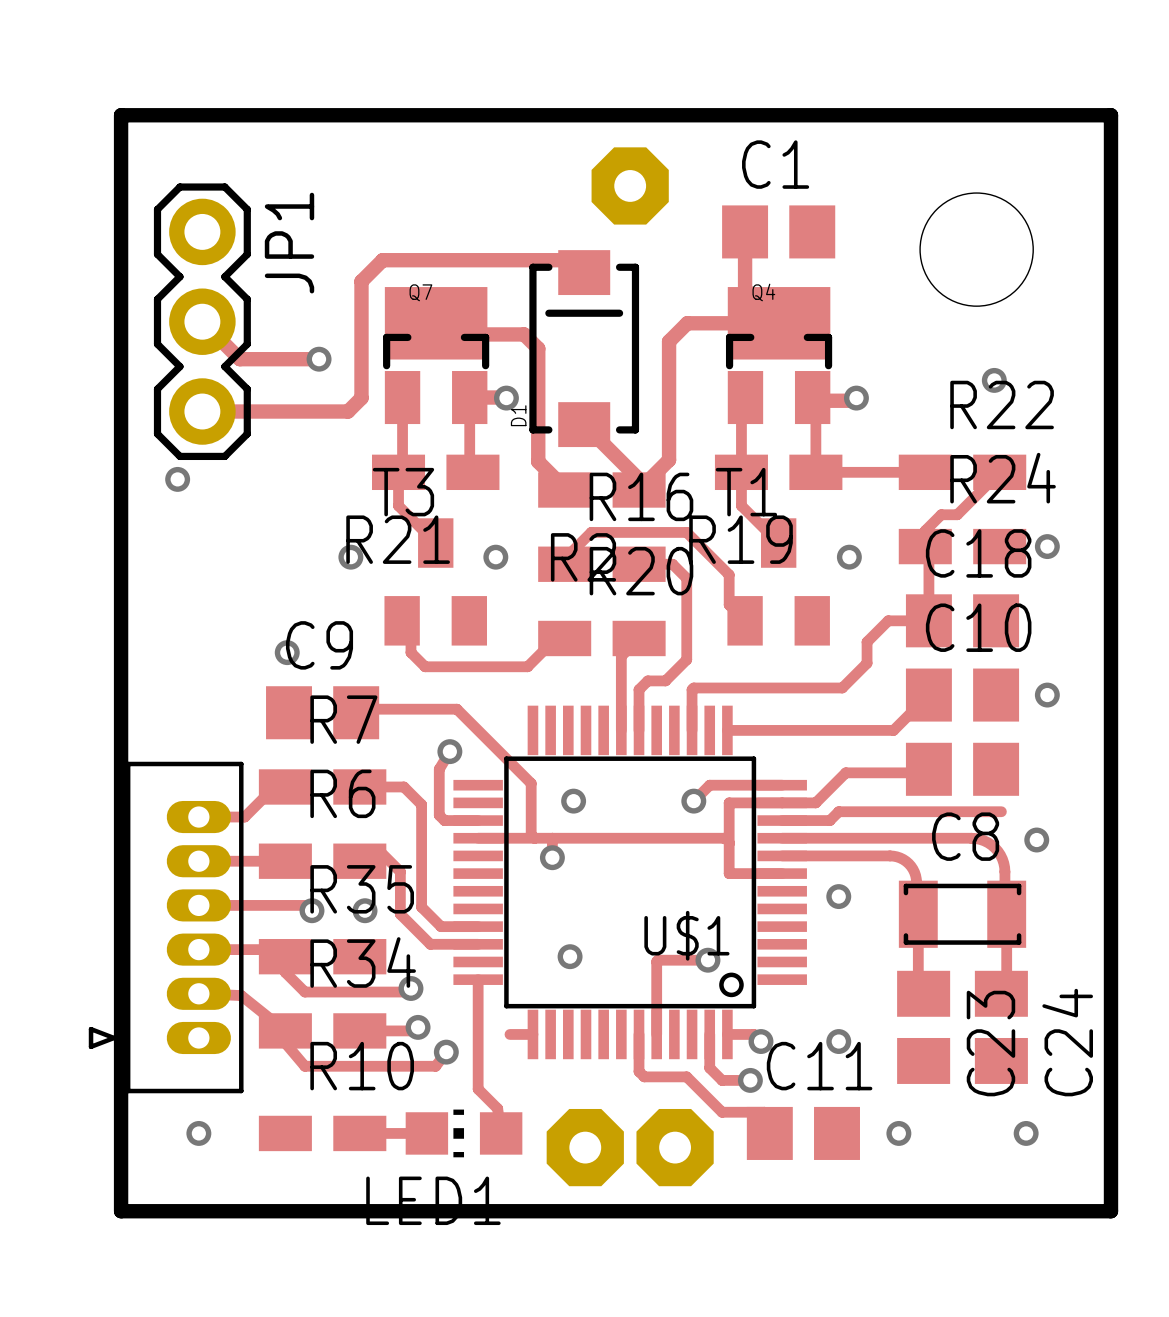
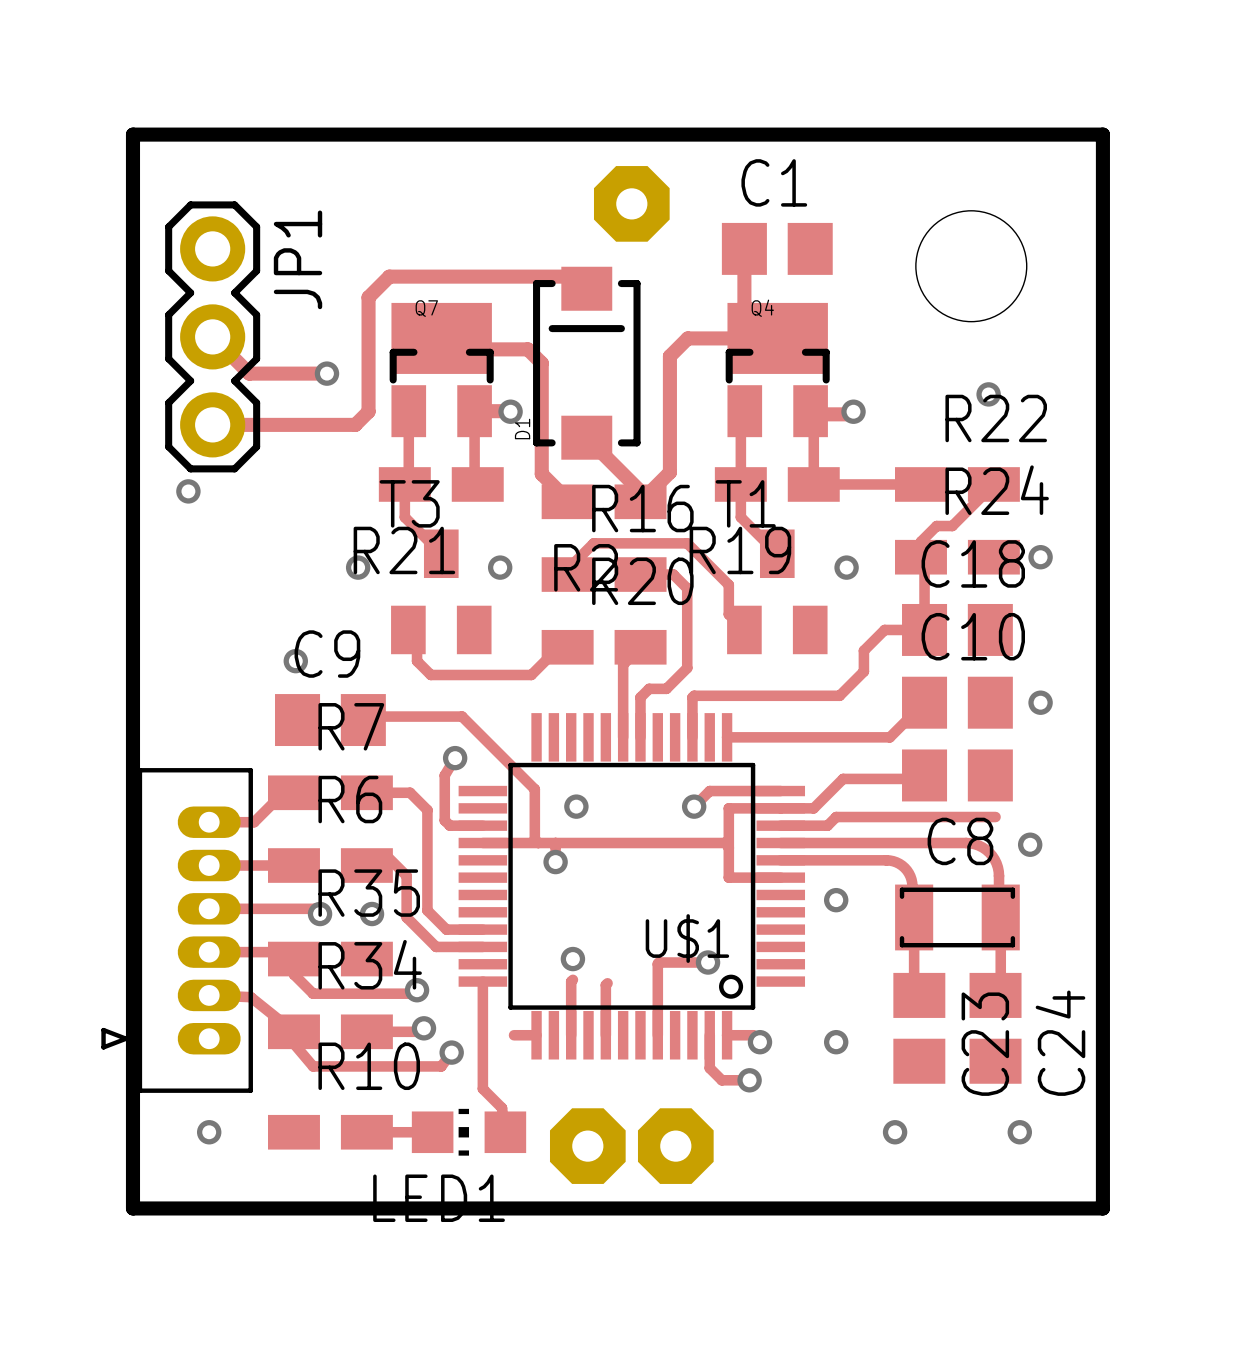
track: none -> (572, 979) (571, 981) (571, 1035)
track: none -> (607, 983) (605, 985) (605, 1035)
track: (639, 1034) (639, 1071) (644, 1076) (686, 1076) (722, 1112) (764, 1112) (769, 1117) (769, 1133) -> none
C11: (803, 1133) -> none

